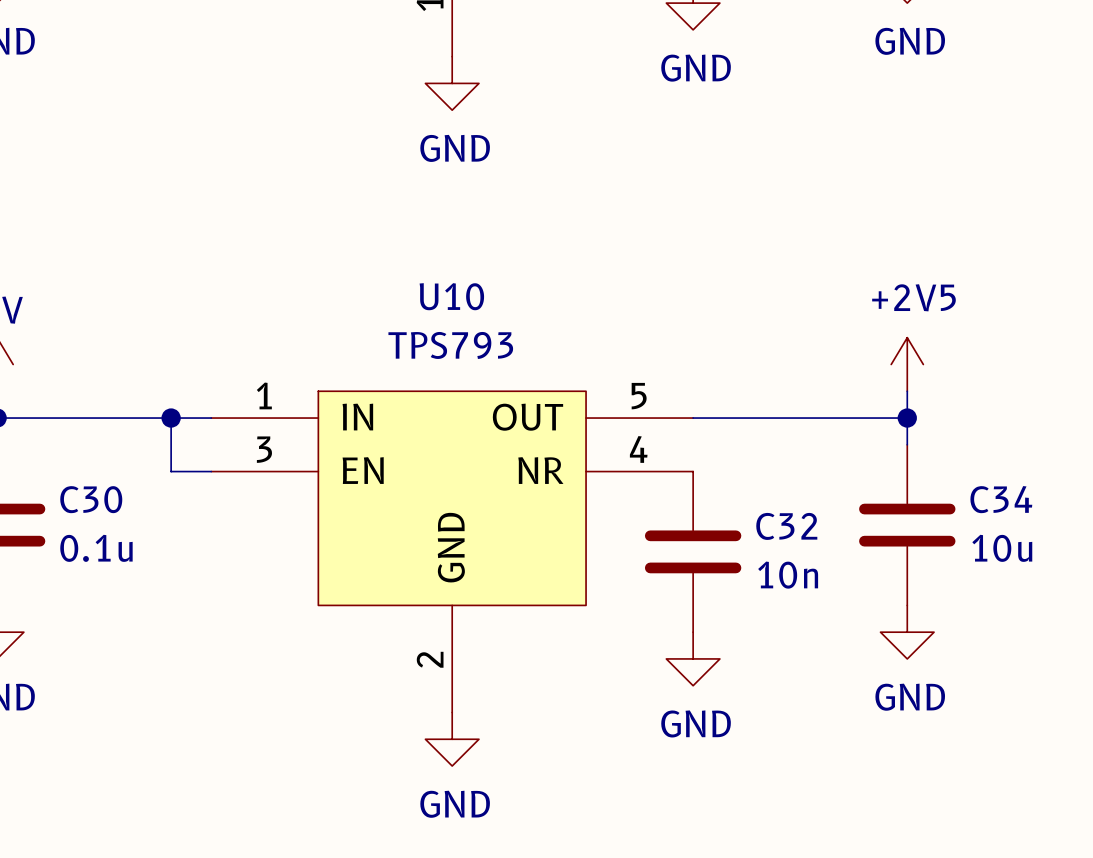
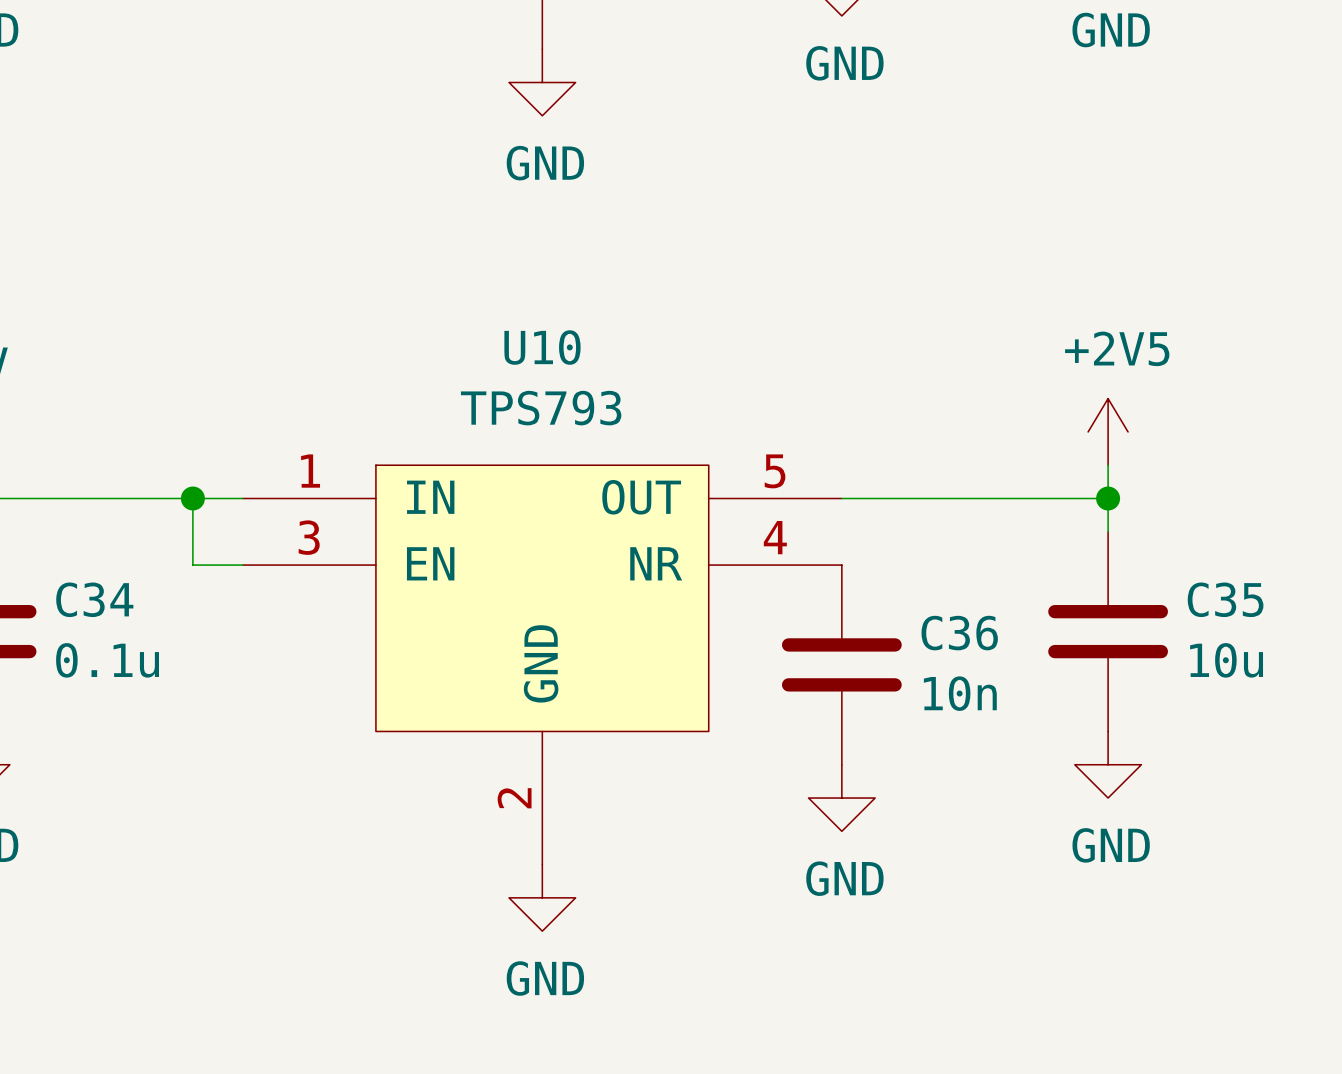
C30 name: C30 (91, 499) -> C34 (94, 599)
C34 name: C34 (1001, 499) -> C35 (1225, 599)
C32 name: C32 (786, 526) -> C36 (959, 633)

